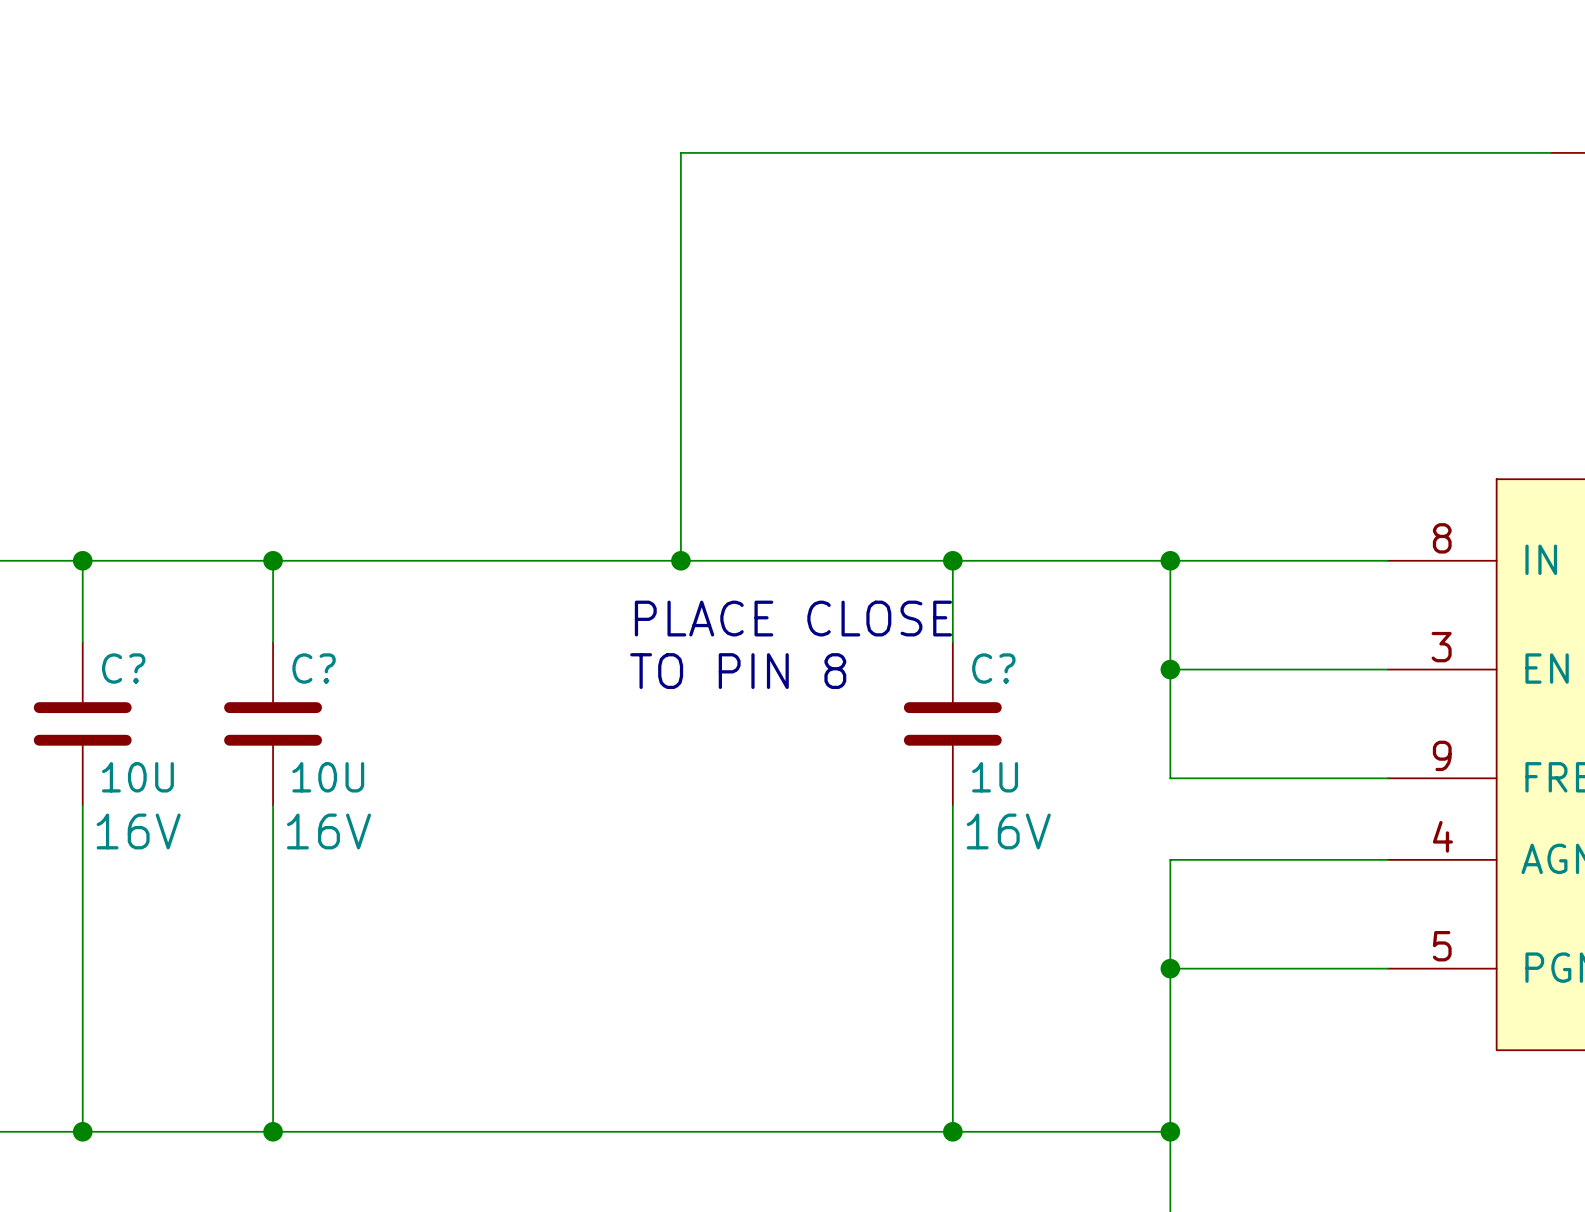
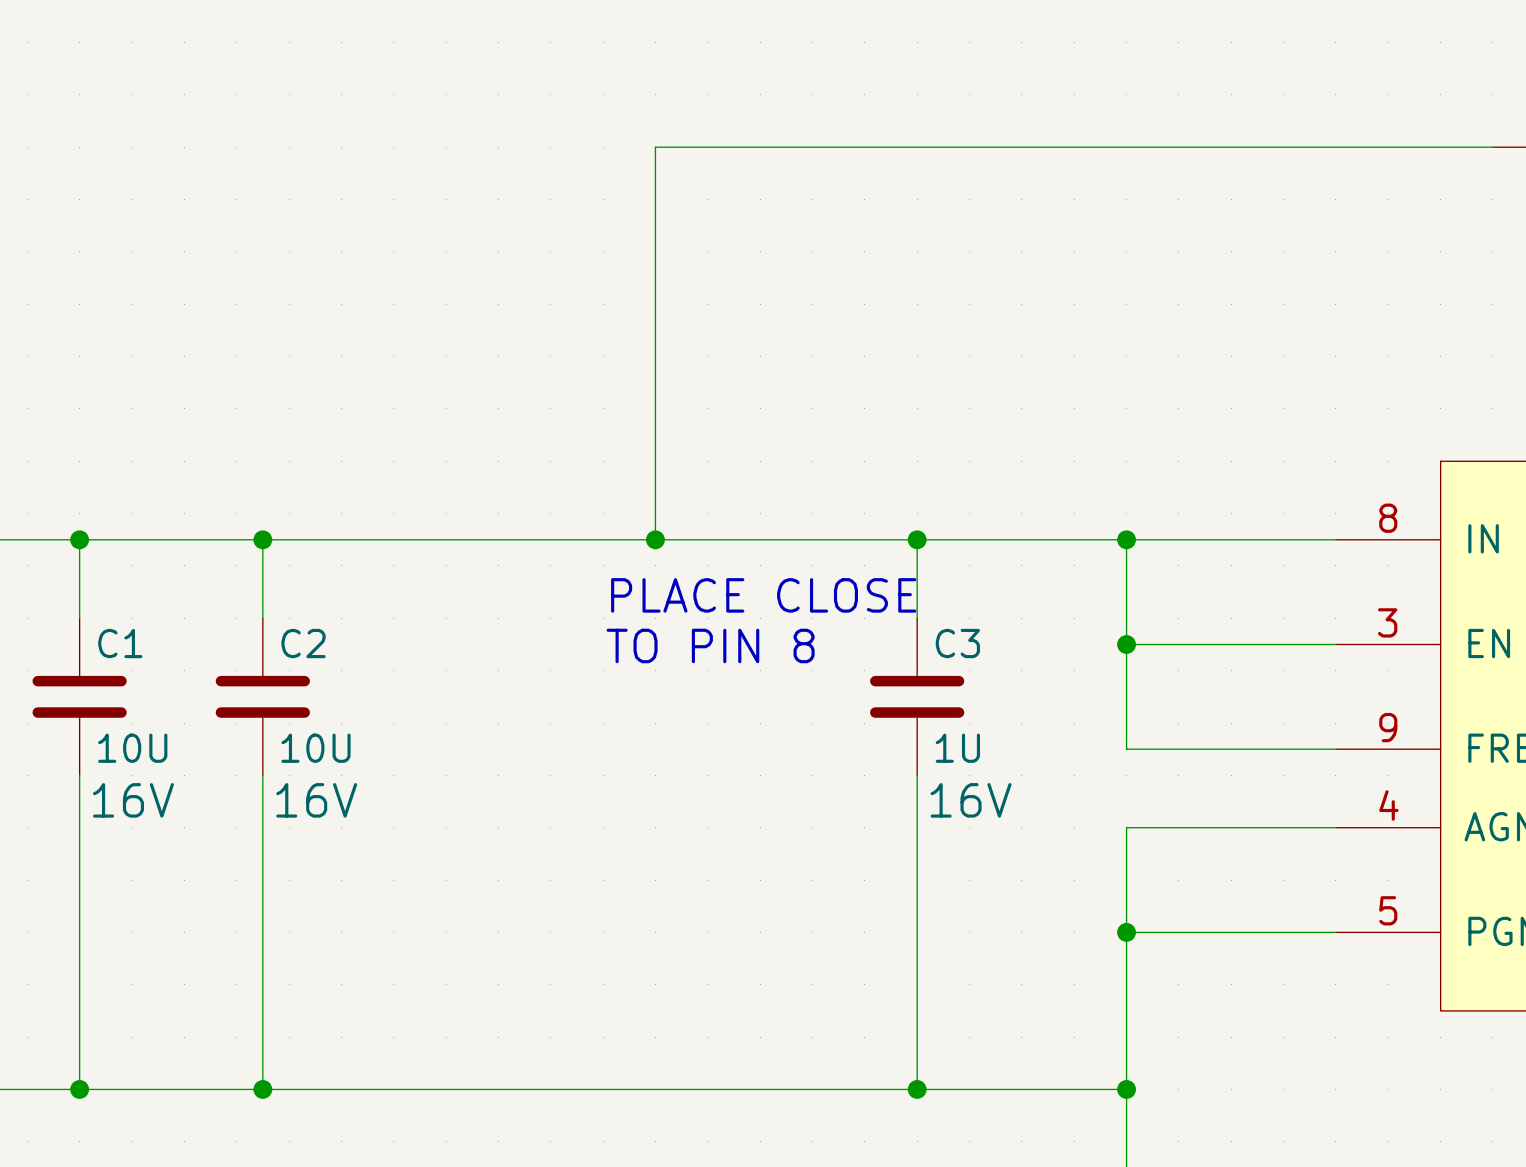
C? name: C? (123, 668) -> C1 (120, 643)
C? name: C? (314, 668) -> C2 (303, 643)
C? name: C? (993, 668) -> C3 (957, 643)

